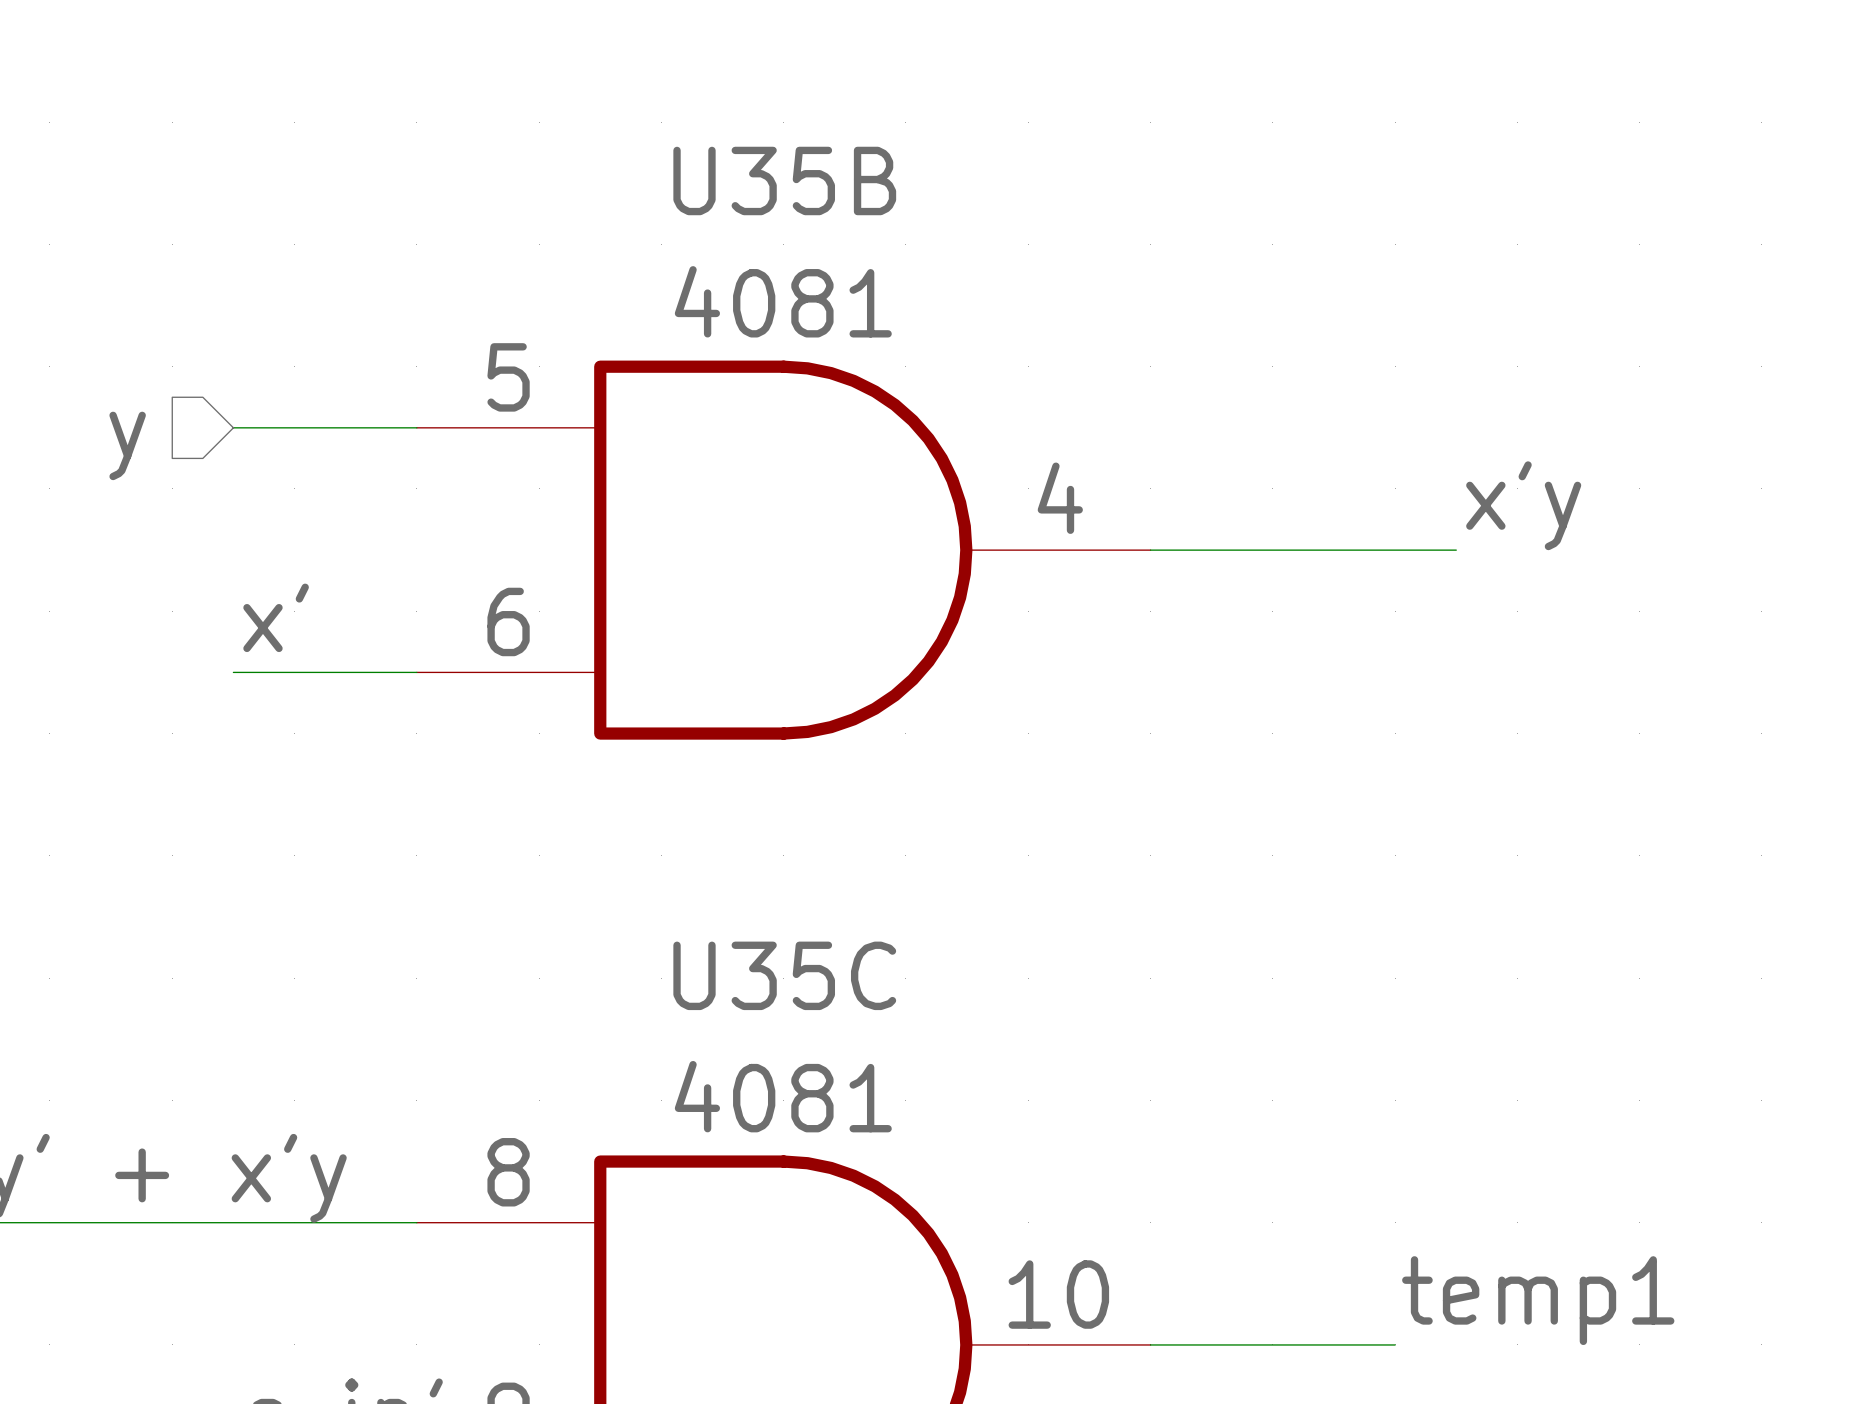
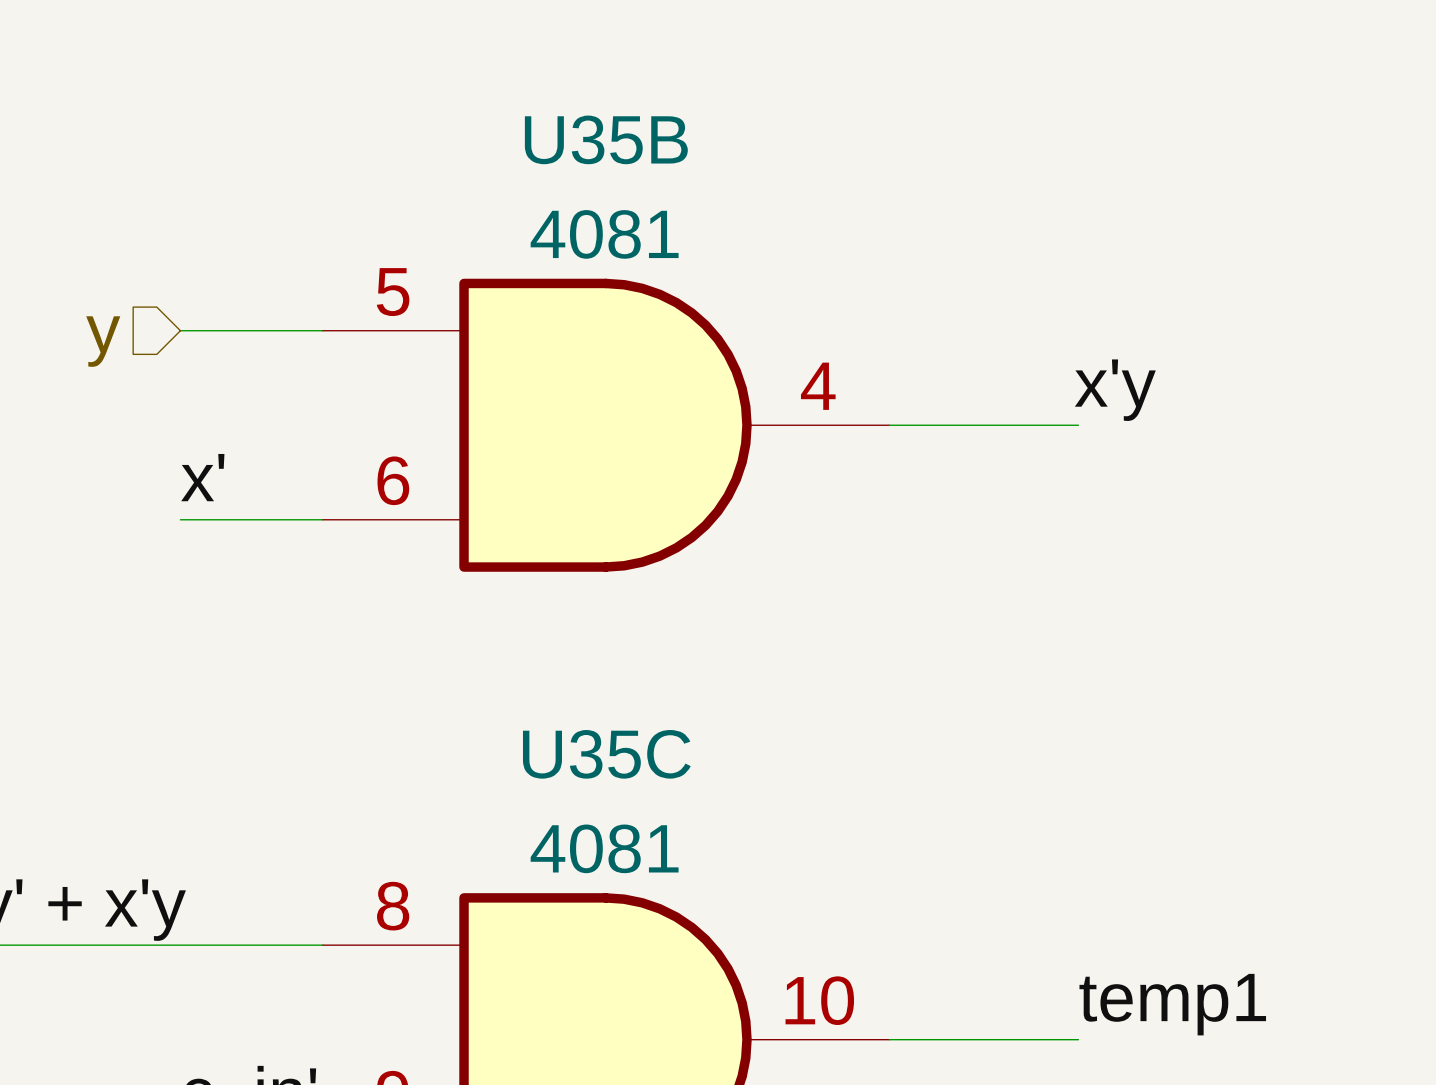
label position: x'y (1523, 505) -> x'y (1115, 390)
wire: (1395, 550) (1456, 550) -> none

